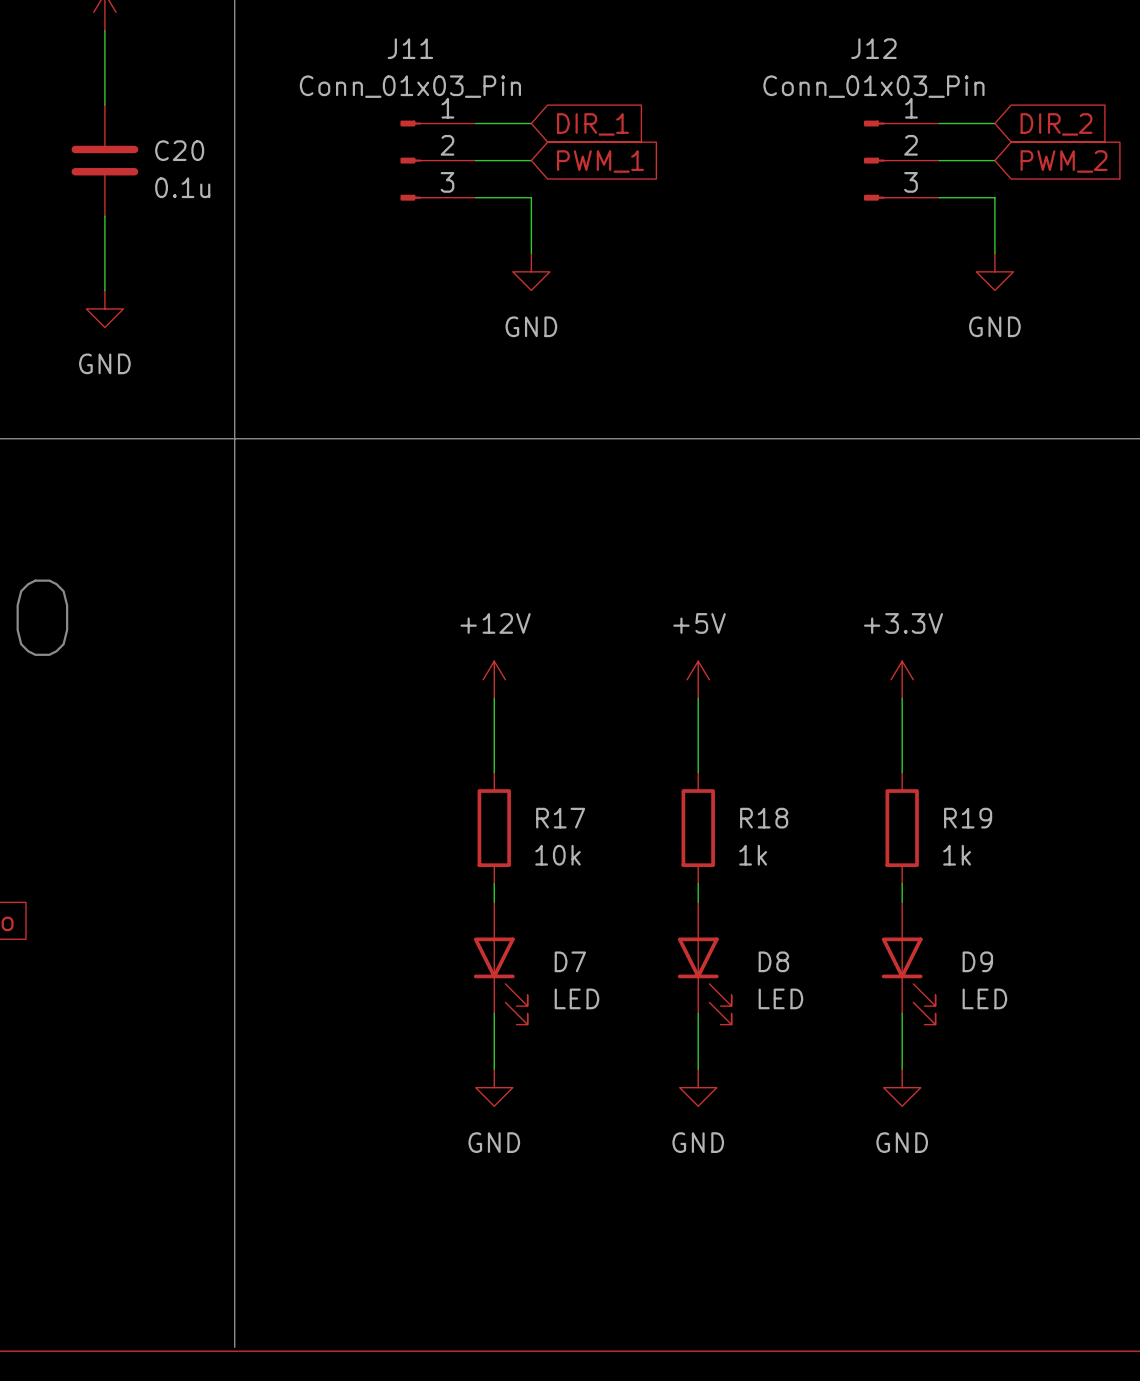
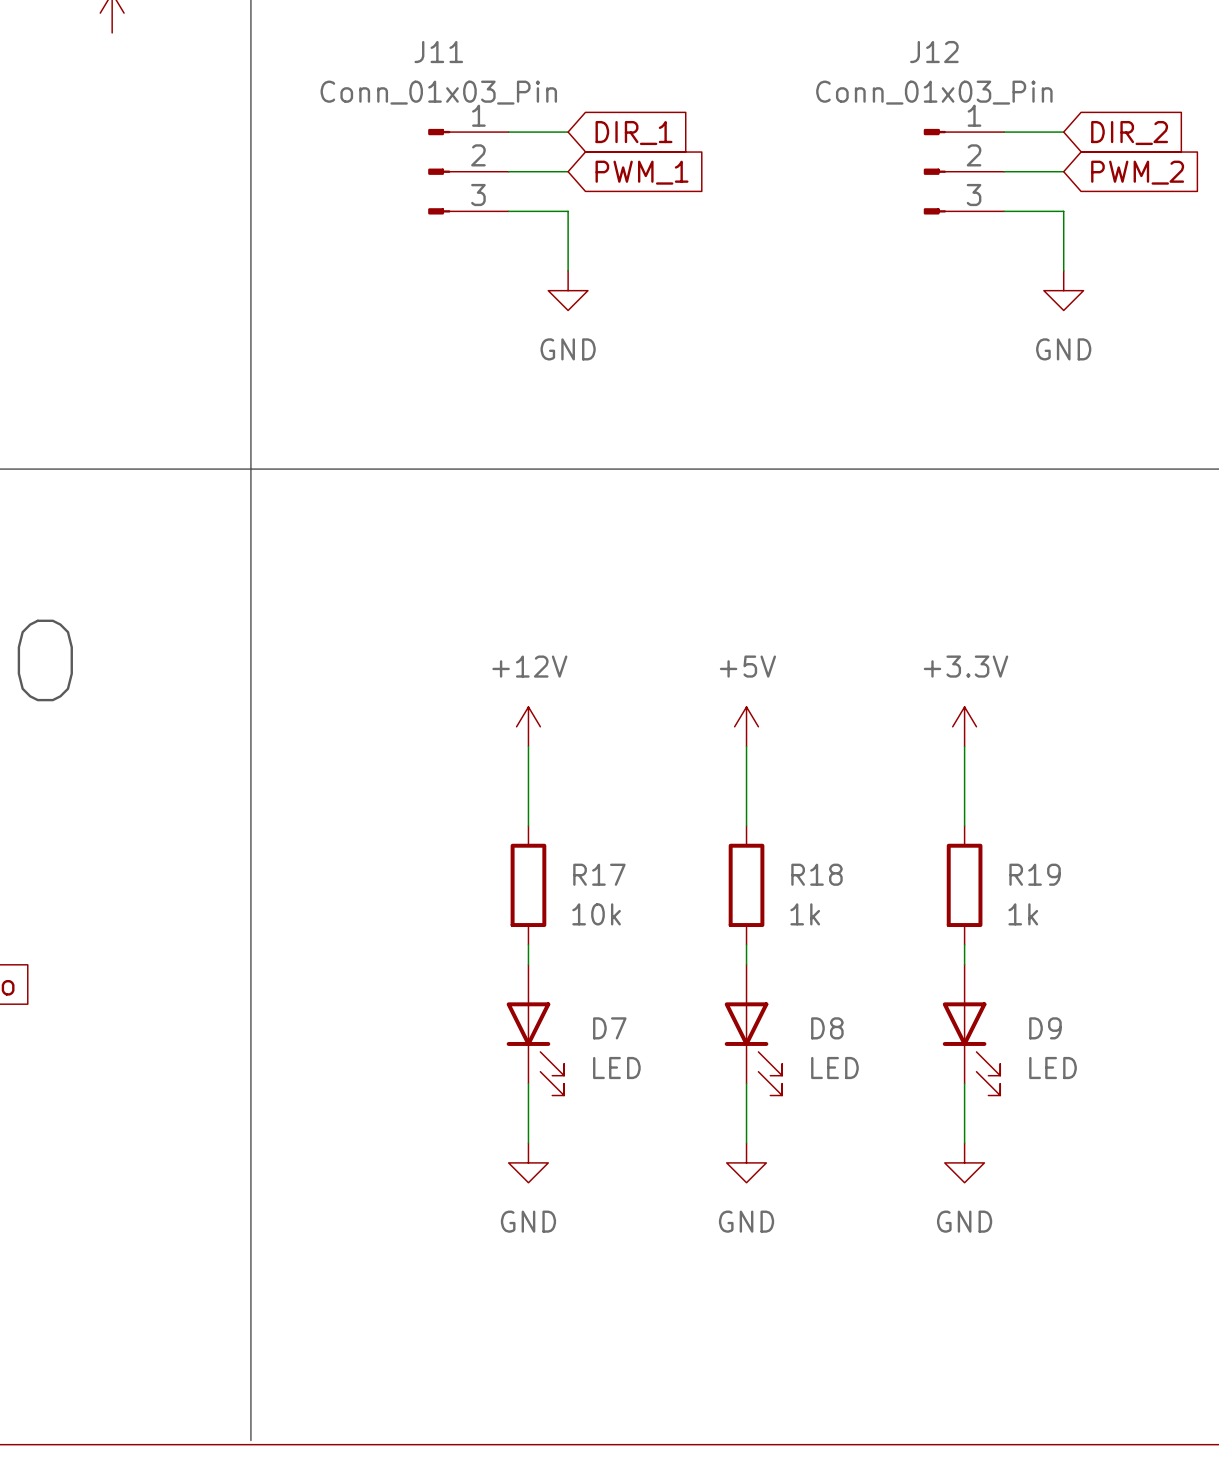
wire: (104, 30) (104, 104) -> none
C20: 0.1u (104, 160) -> none
wire: (104, 216) (104, 290) -> none
power symbol: GND (104, 308) -> none

